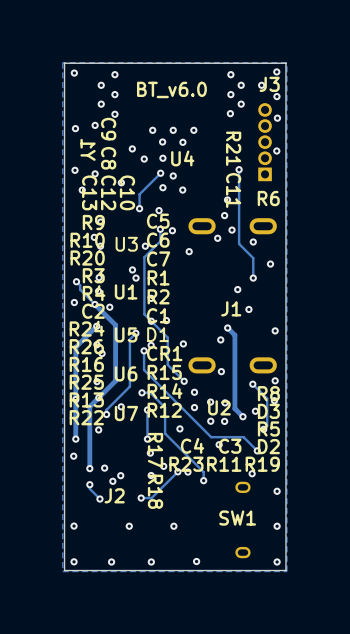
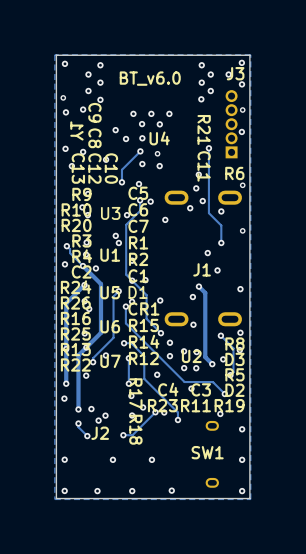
via: none -> (63, 97)
via: (277, 118) -> none
via: none -> (242, 110)
via: (173, 175) -> none
via: none -> (157, 153)
via: none -> (242, 185)
via: (270, 264) -> none
via: none -> (242, 230)

